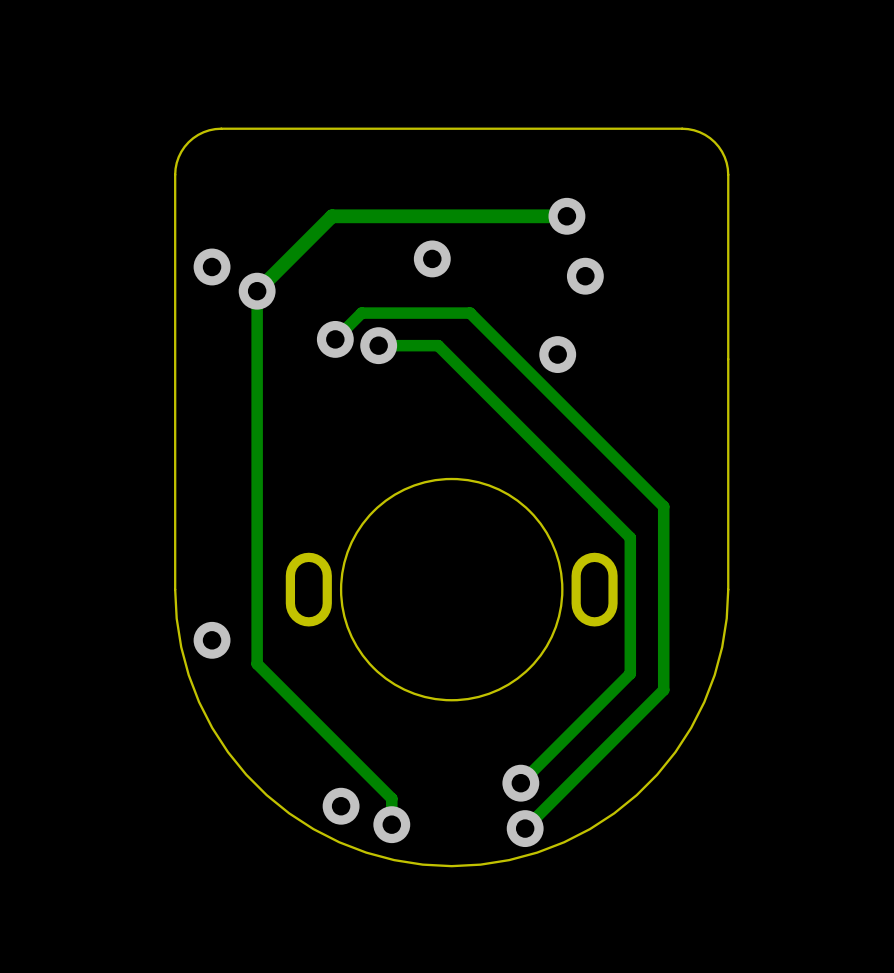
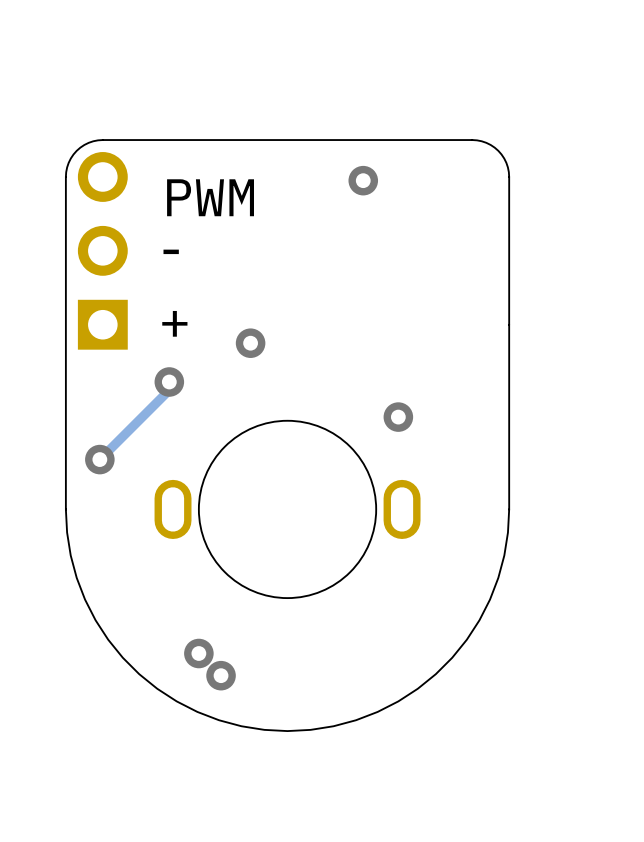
text: none -> PWM (210, 197)
track: (566, 216) (332, 216) (257, 291) (257, 663) (391, 798) (391, 824) -> none
via position: (566, 216) -> (363, 180)
via: (432, 258) -> none
via: (212, 266) -> none
part: none -> (102, 250)
text: none -> - (171, 251)
via: (585, 276) -> none
via: (257, 291) -> none
track: (335, 339) (361, 313) (470, 313) (663, 506) (663, 690) (525, 828) -> none
via: (335, 339) -> none
track: (378, 345) (438, 345) (630, 537) (630, 673) (520, 783) -> none
via position: (378, 345) -> (250, 343)
via: (557, 354) -> none
text: none -> + (174, 323)
track: none -> (169, 381) (169, 390) (99, 459)
via: none -> (169, 381)
via: none -> (398, 417)
via: none -> (99, 459)
via: (212, 640) -> none
via: none -> (198, 653)
via: (520, 783) -> none
via: none -> (221, 675)
via: (341, 806) -> none
via: (391, 824) -> none
via: (525, 828) -> none

